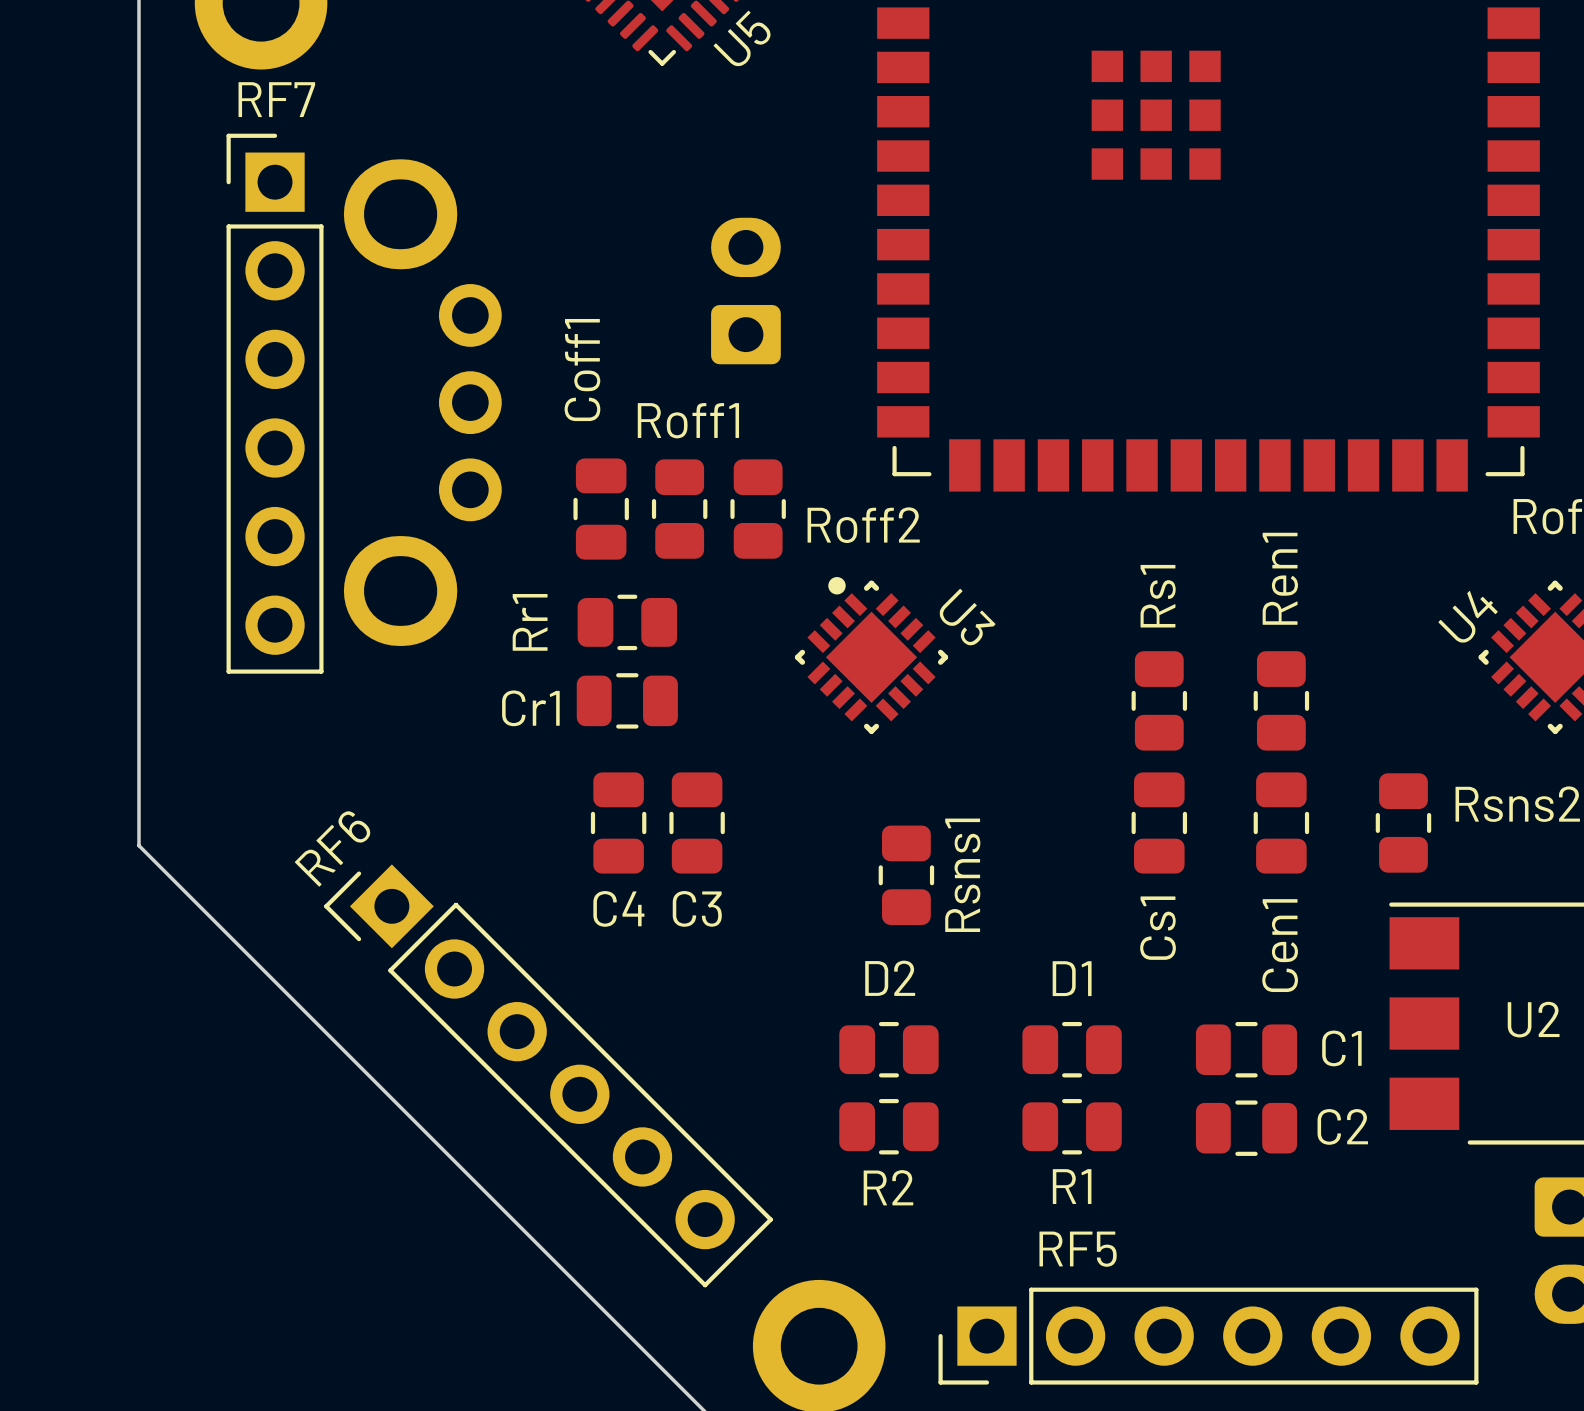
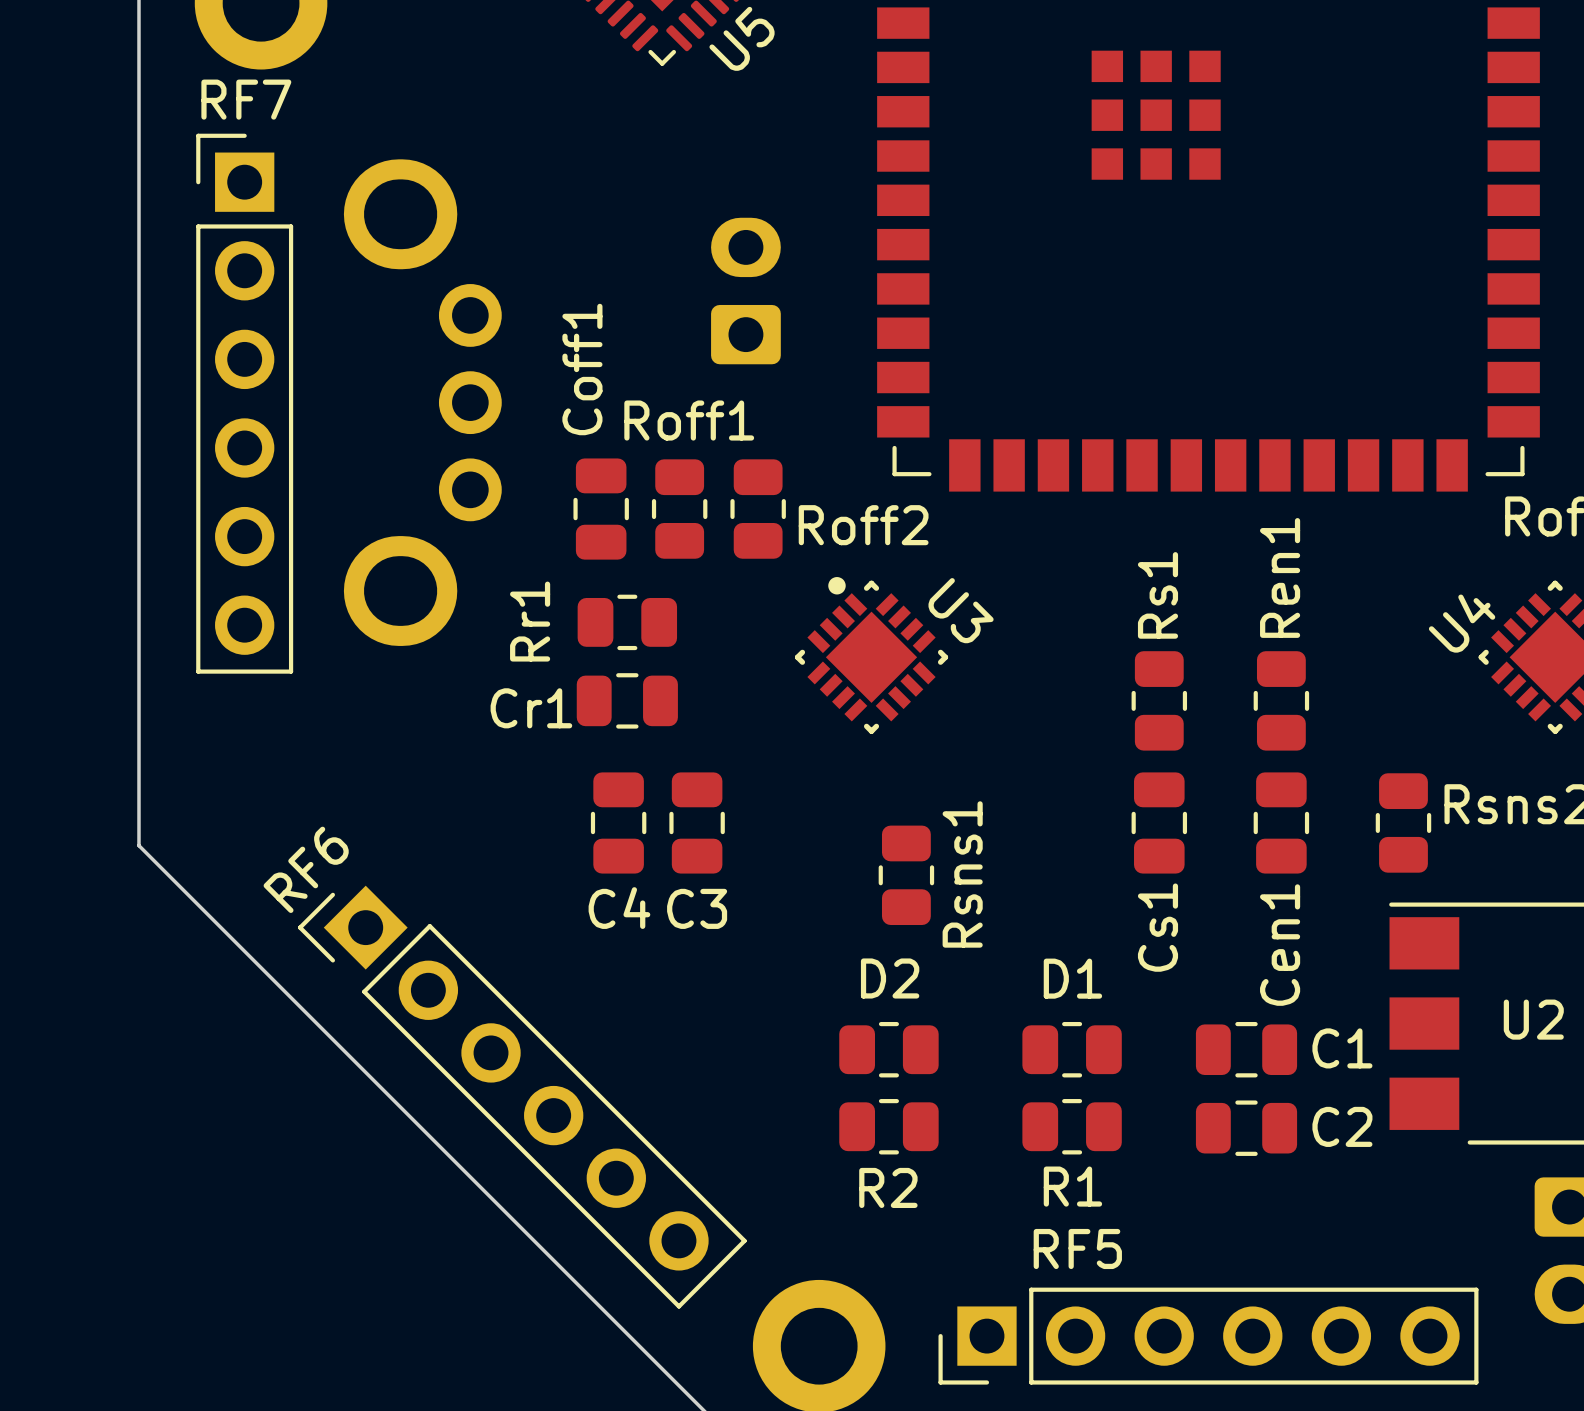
RF7 position: (275, 403) -> (244, 403)
RF6 position: (548, 1075) -> (522, 1097)

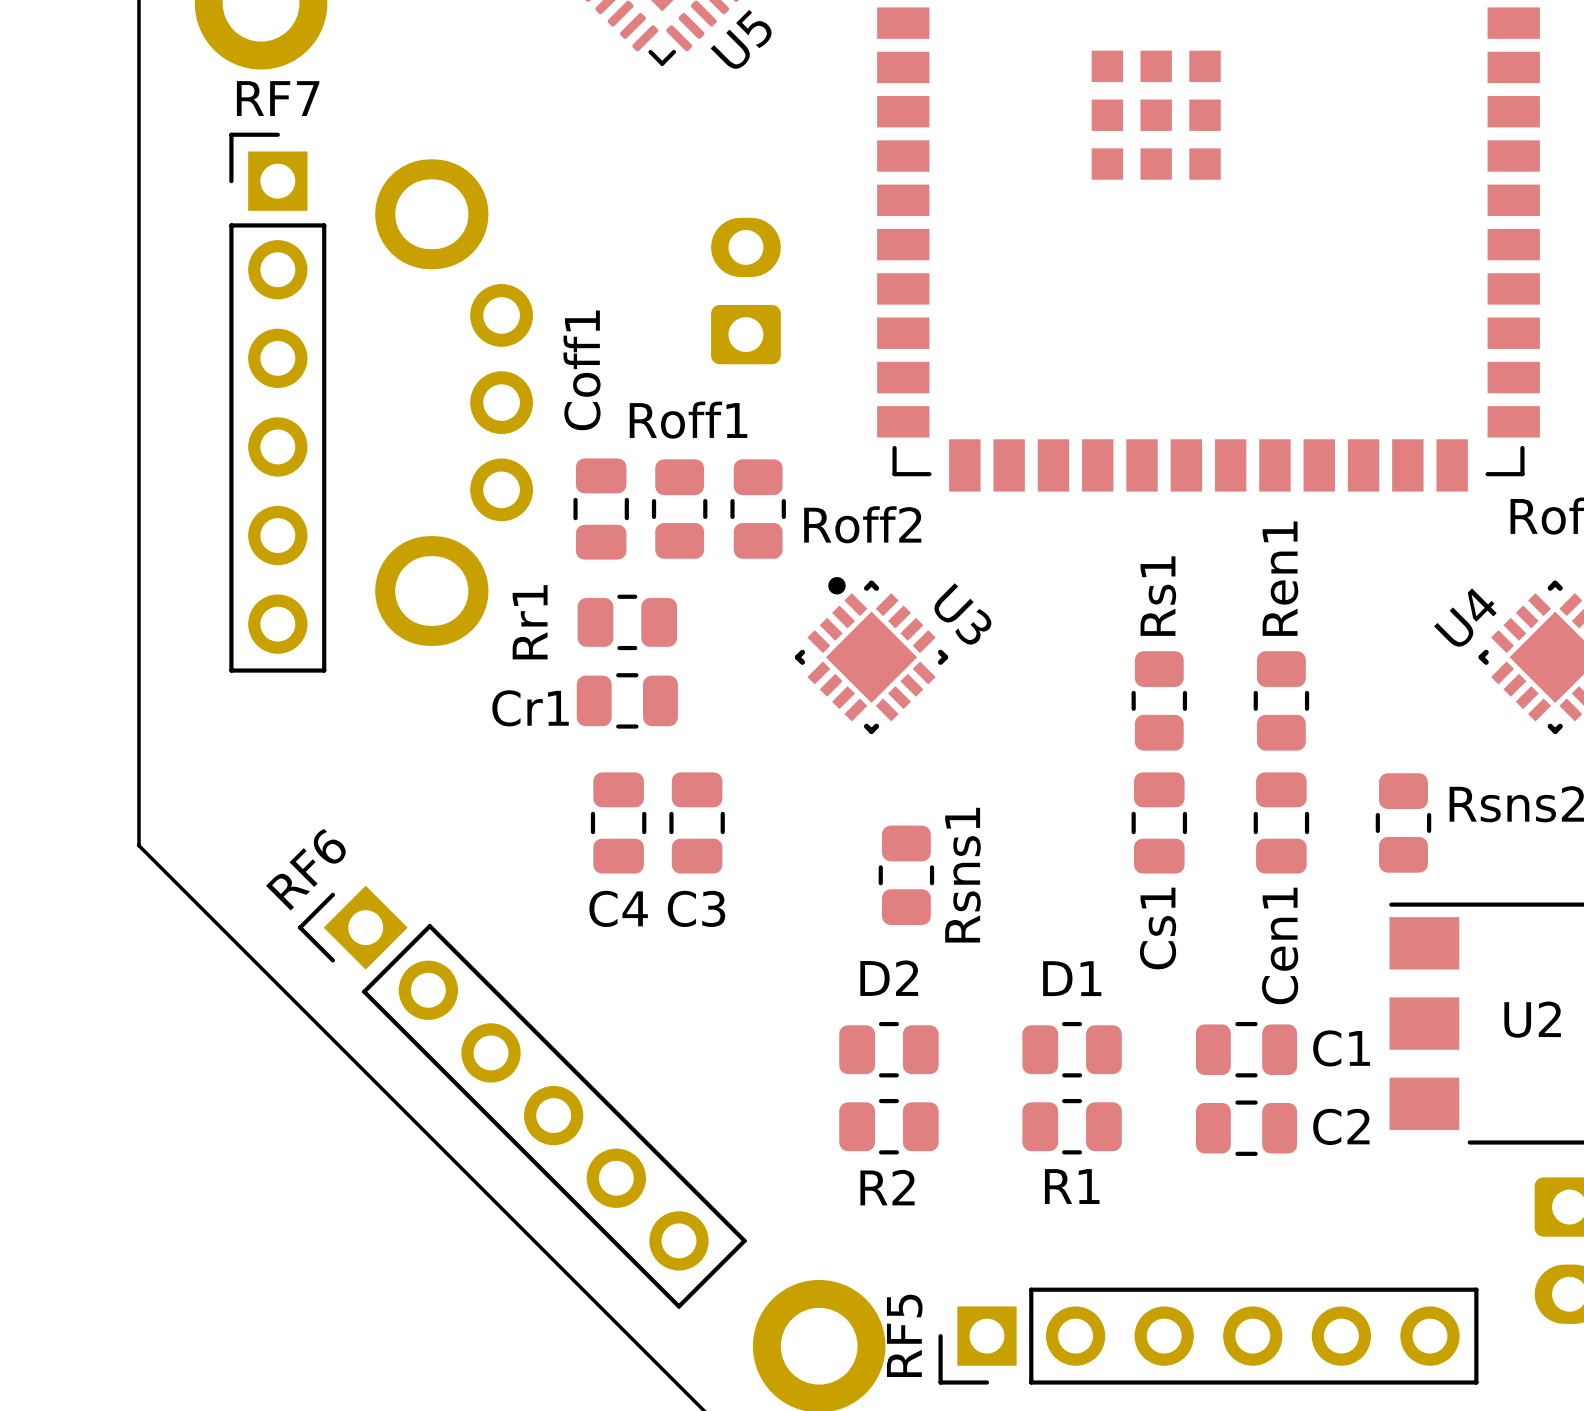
part position: (422, 402) -> (454, 402)
RF7 position: (244, 403) -> (277, 402)
RF5 name rotation: 0° (1077, 1248) -> 90° counterclockwise (904, 1335)
RF5 name position: RF5 (1077, 1248) -> RF5 (904, 1335)

